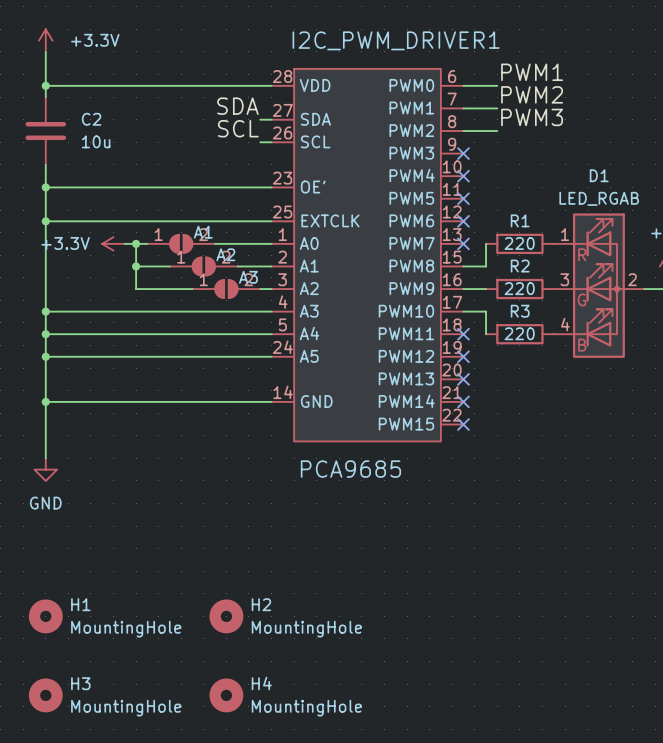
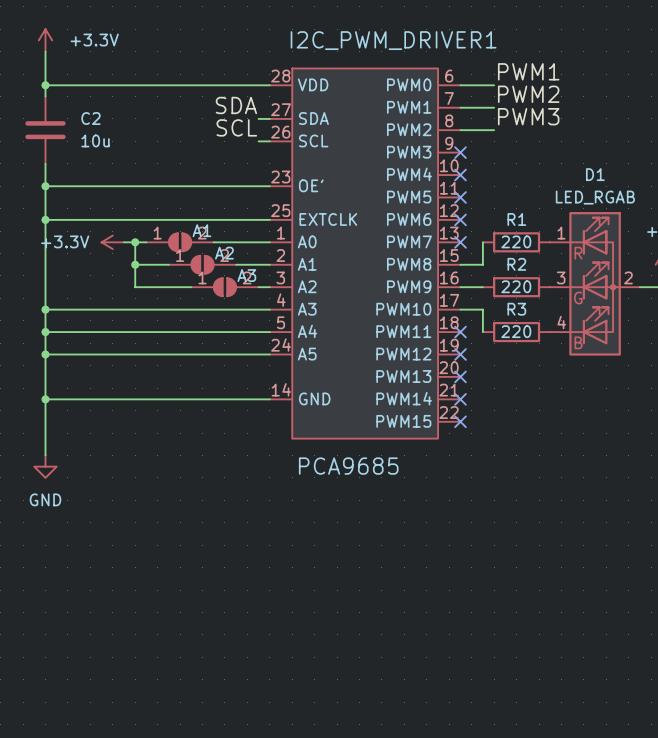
H1: MountingHole (45, 616) -> none
H2: MountingHole (226, 616) -> none
H3: MountingHole (45, 695) -> none
H4: MountingHole (226, 695) -> none

